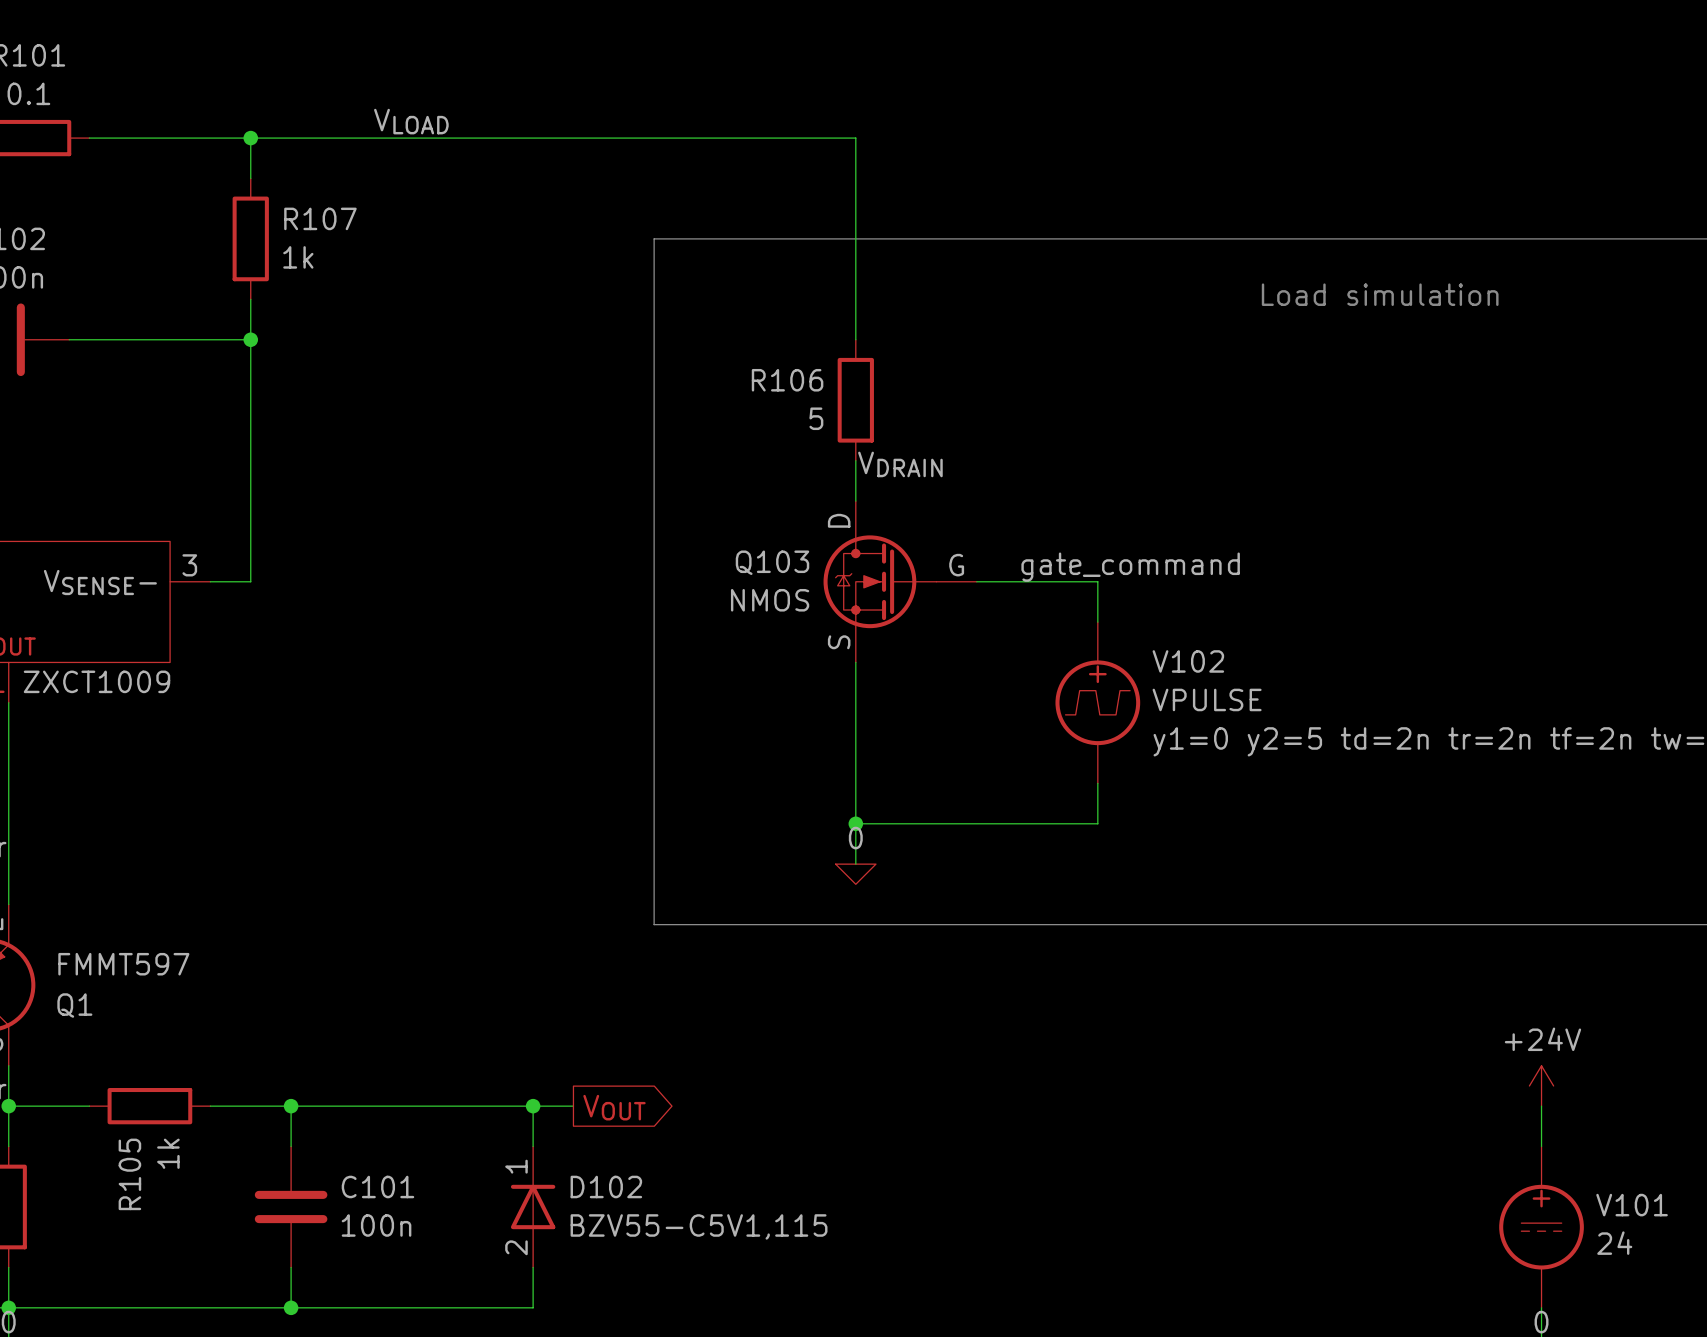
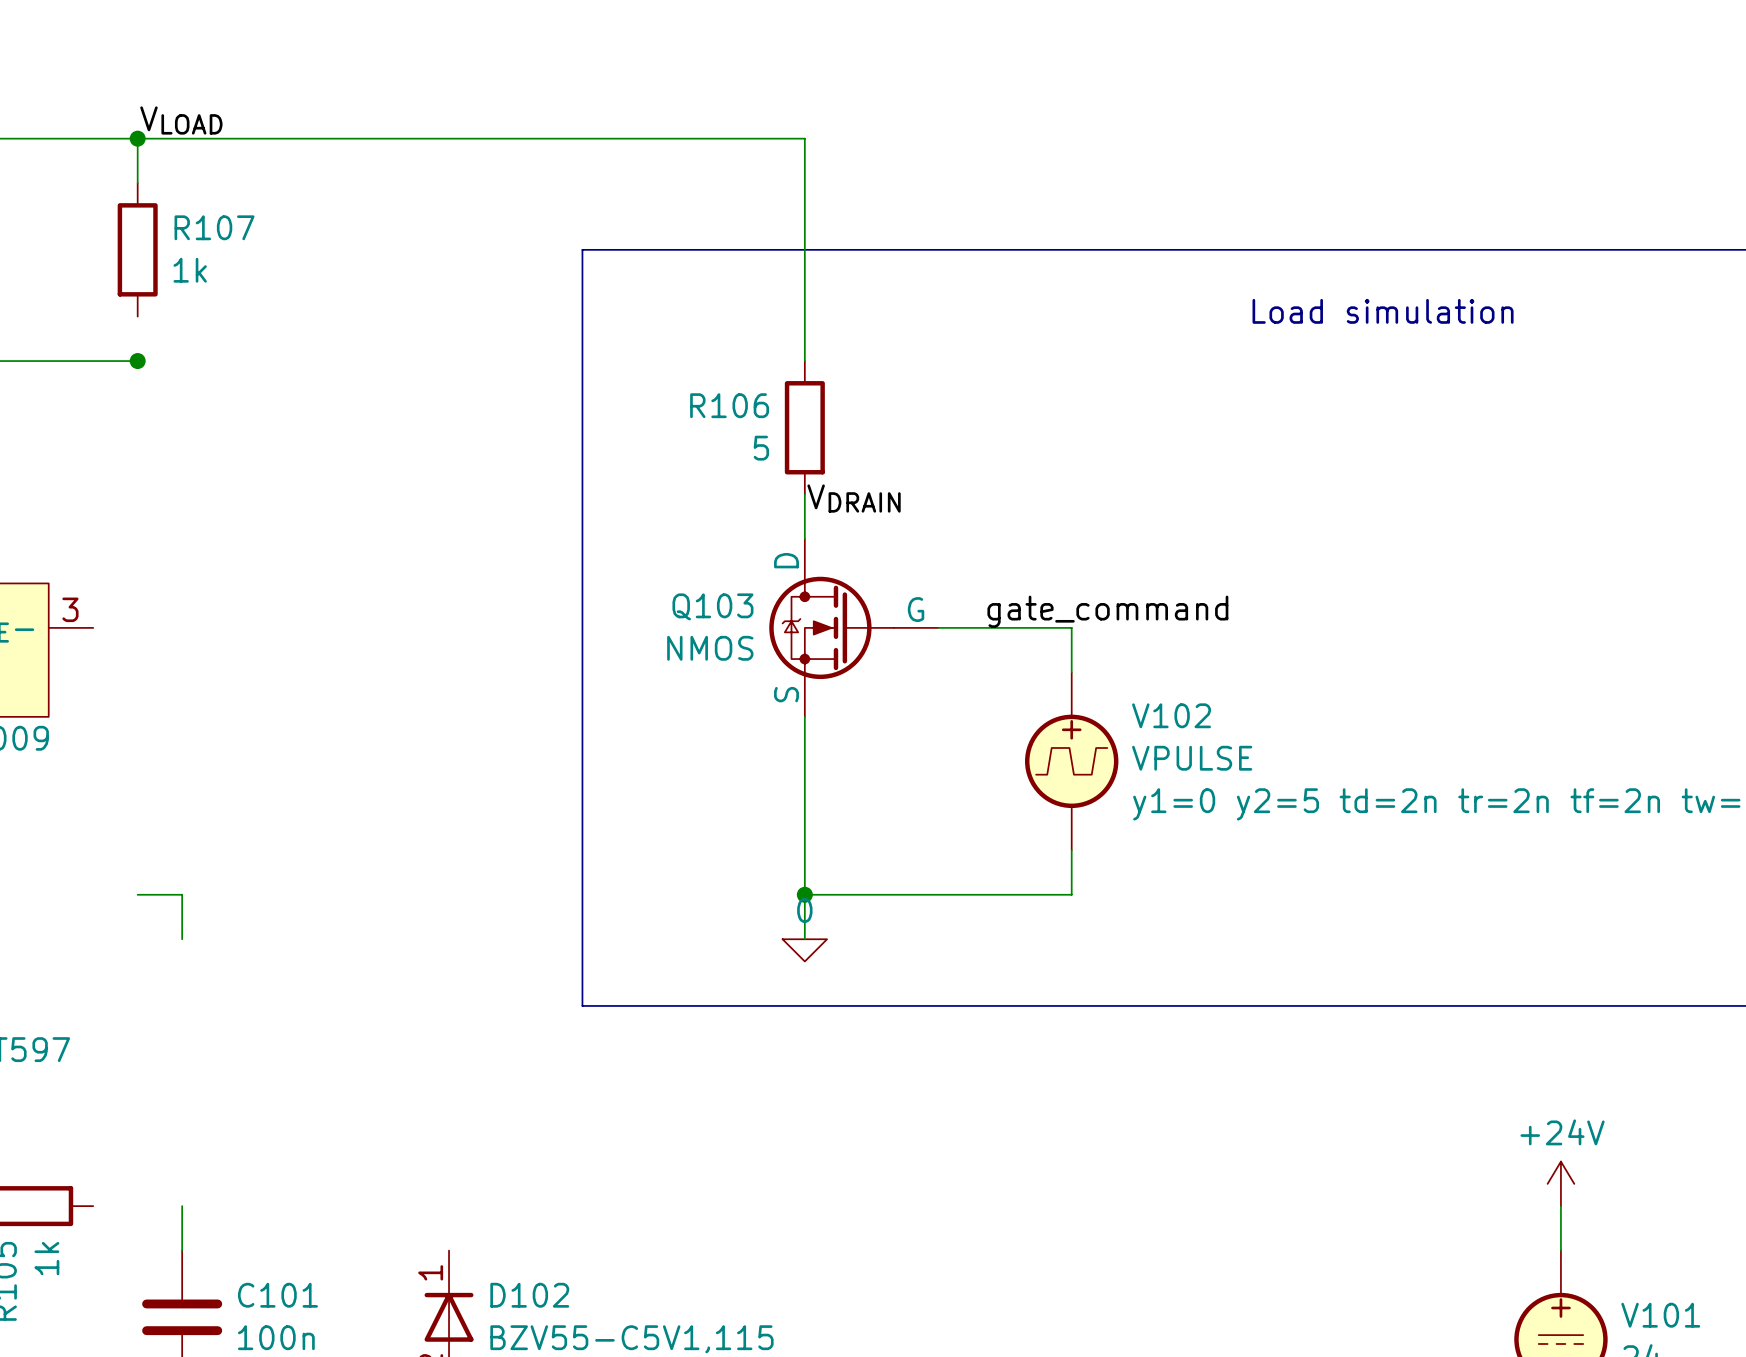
label position: VLOAD (411, 121) -> VLOAD (181, 120)
wire: (250, 299) (250, 581) (210, 581) -> none
wire: none -> (137, 894) (182, 894) (182, 939)
wire: (210, 1106) (573, 1106) -> none
junction: (291, 1106) -> none
wire: (533, 1106) (533, 1146) -> none
junction: (533, 1106) -> none
global label: VOUT (614, 1107) -> none

